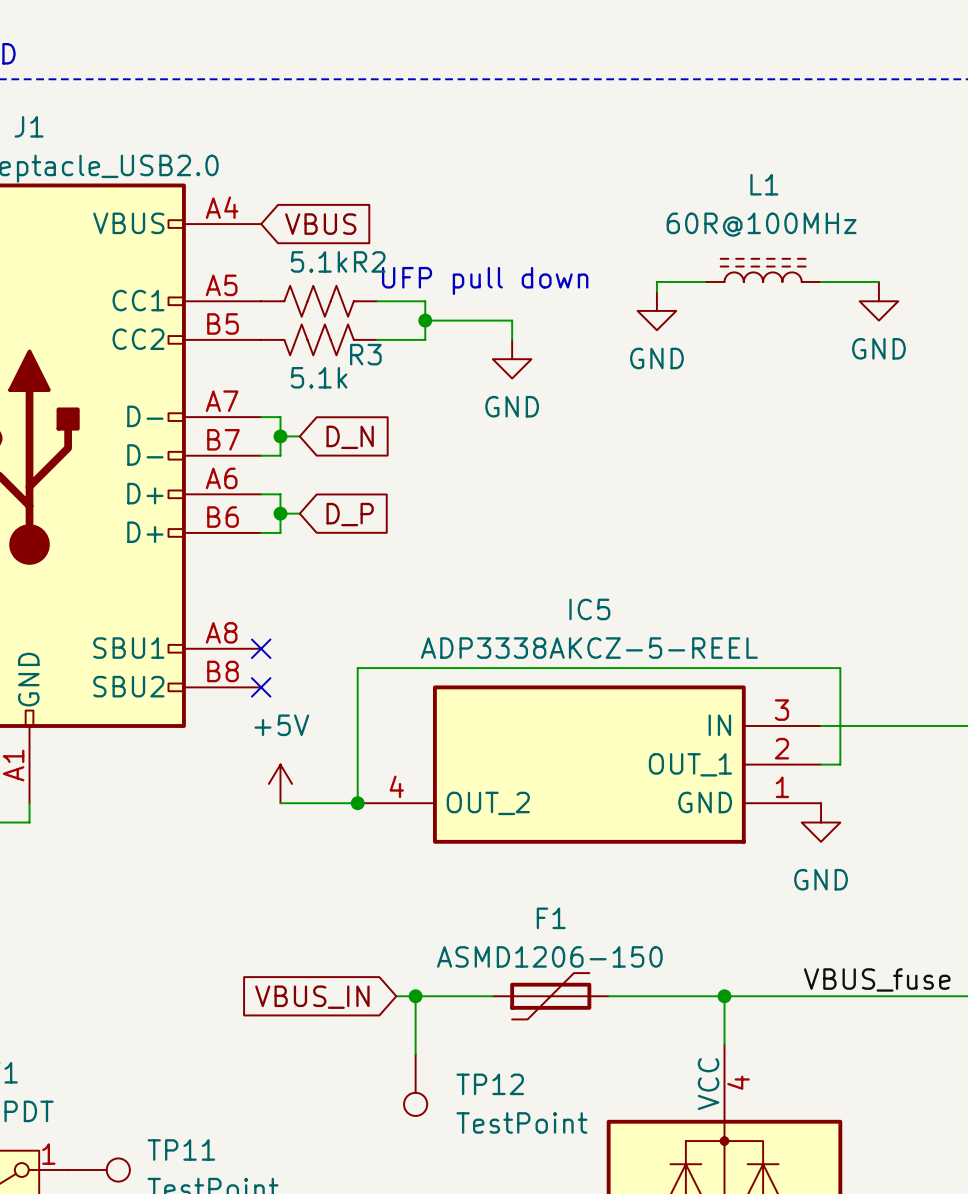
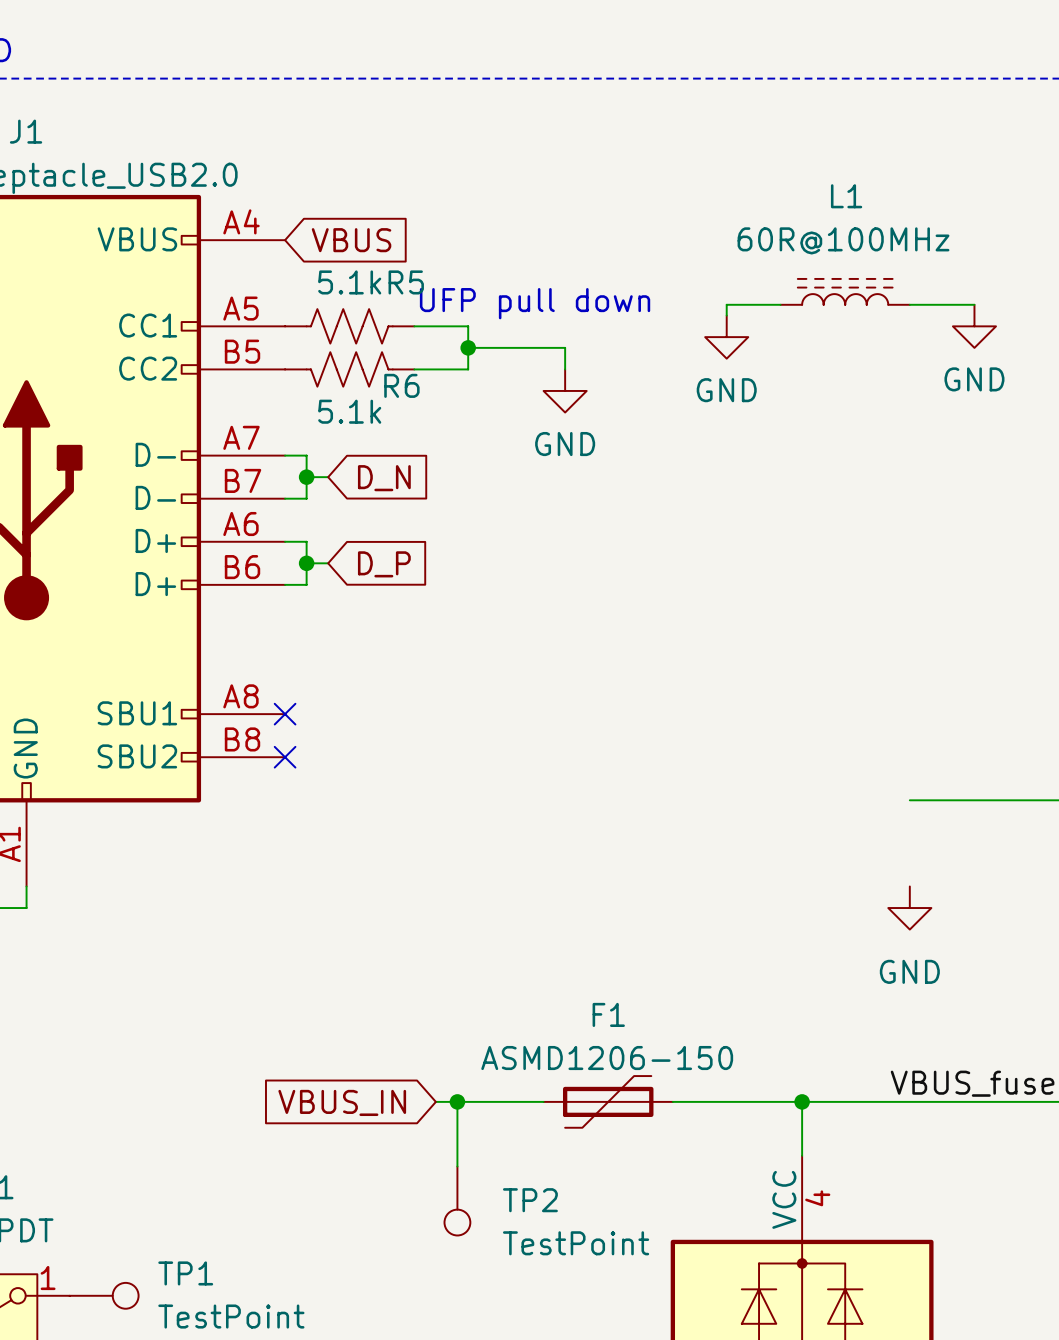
R2 name: R2 (369, 261) -> R5 (406, 282)
R3 name: R3 (365, 354) -> R6 (401, 385)
IC5: ADP3338AKCZ-5-REEL (589, 764) -> none
wire: (821, 764) (840, 764) (840, 668) (357, 668) (357, 803) (280, 803) -> none
power symbol: +5V (280, 783) -> none
junction: (357, 803) -> none
TP12 name: TP12 (490, 1084) -> TP2 (530, 1200)
TP11 name: TP11 (181, 1149) -> TP1 (185, 1273)

